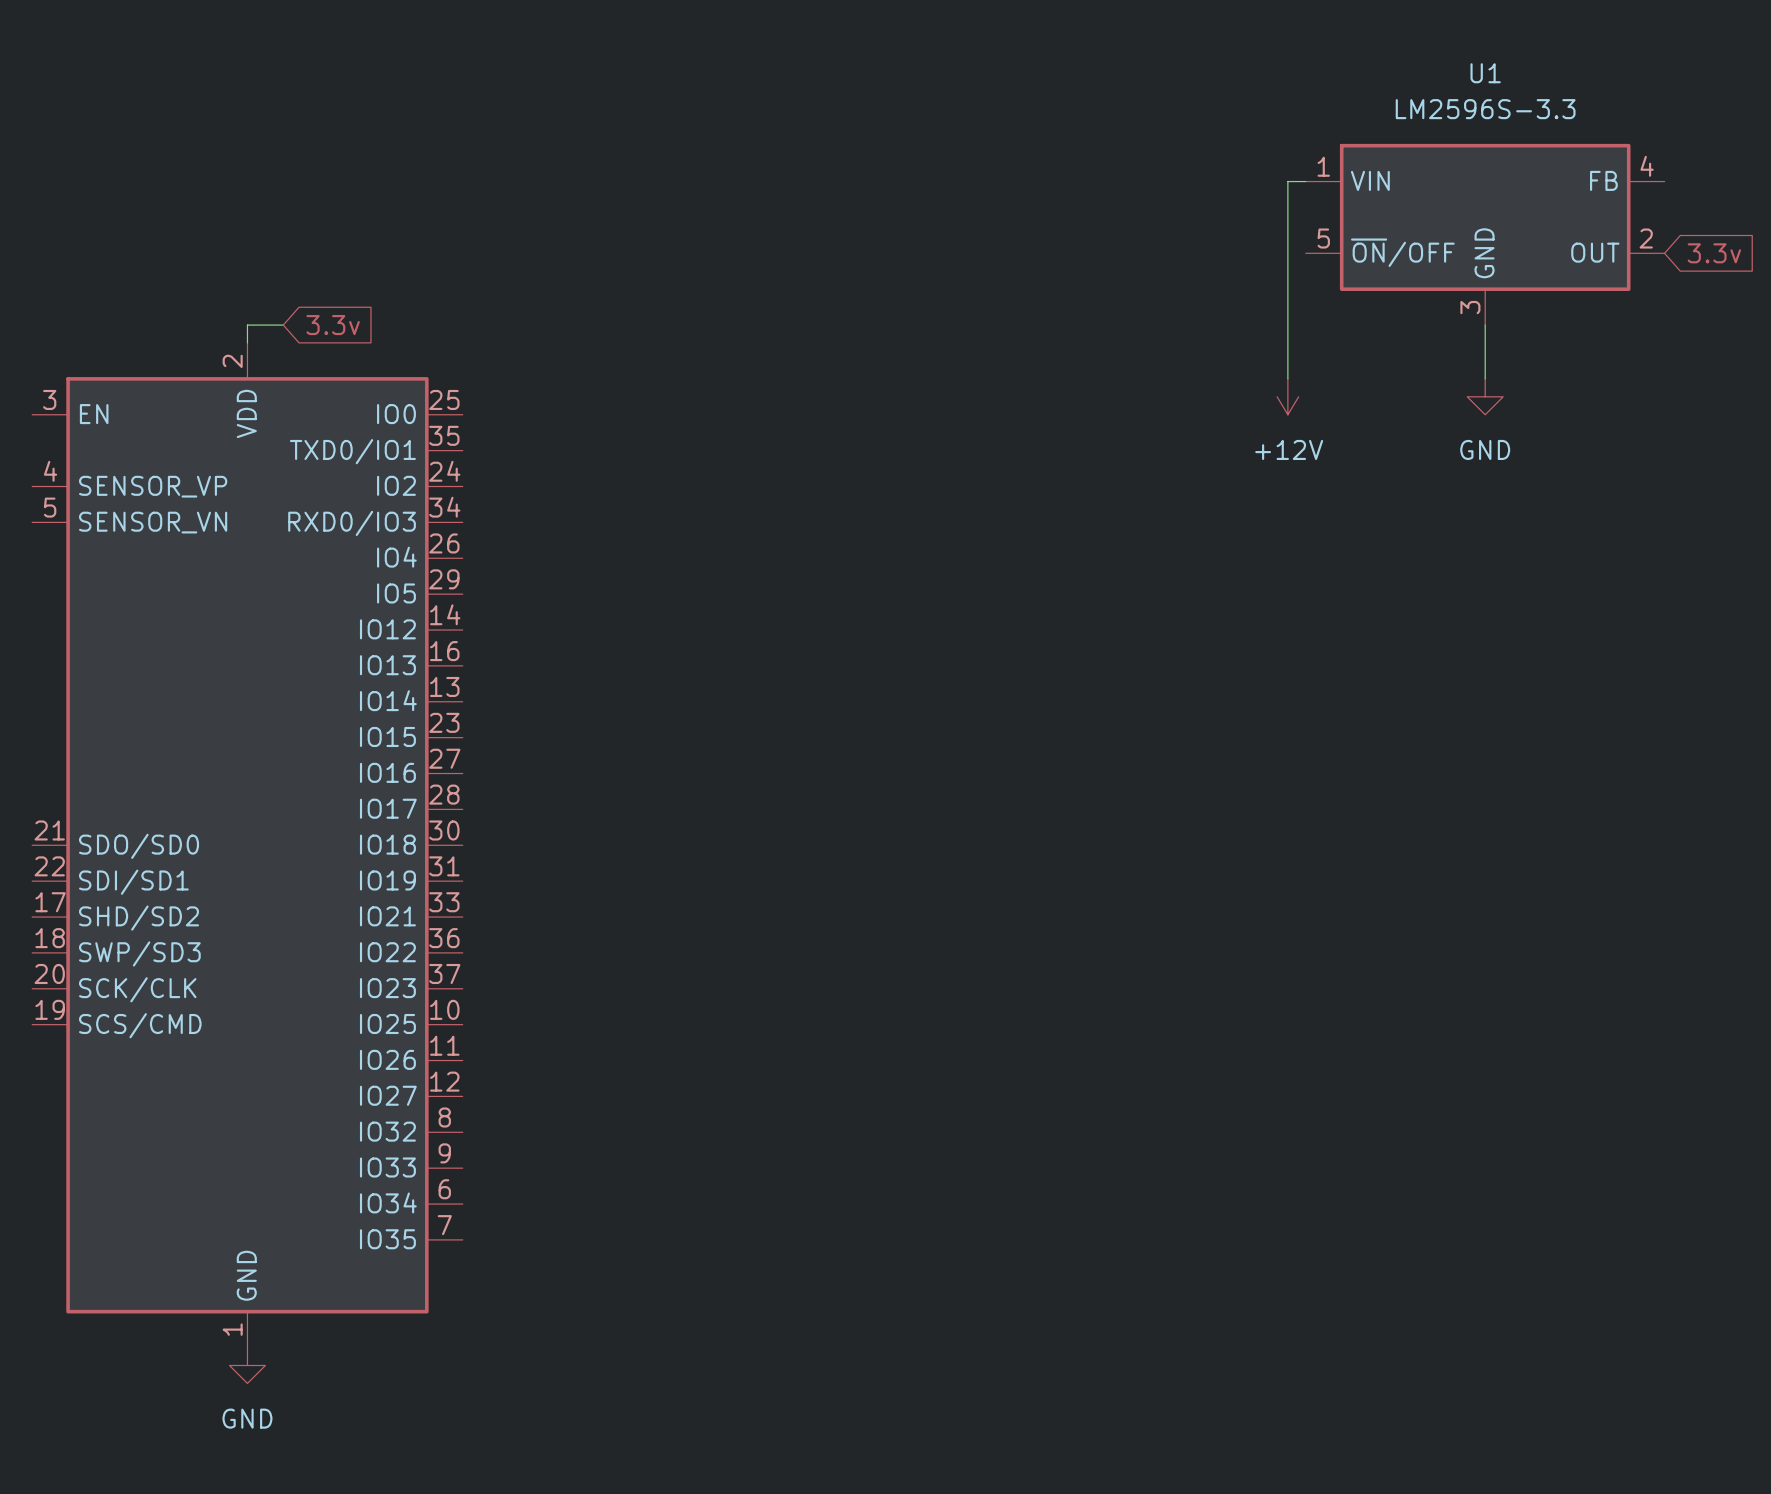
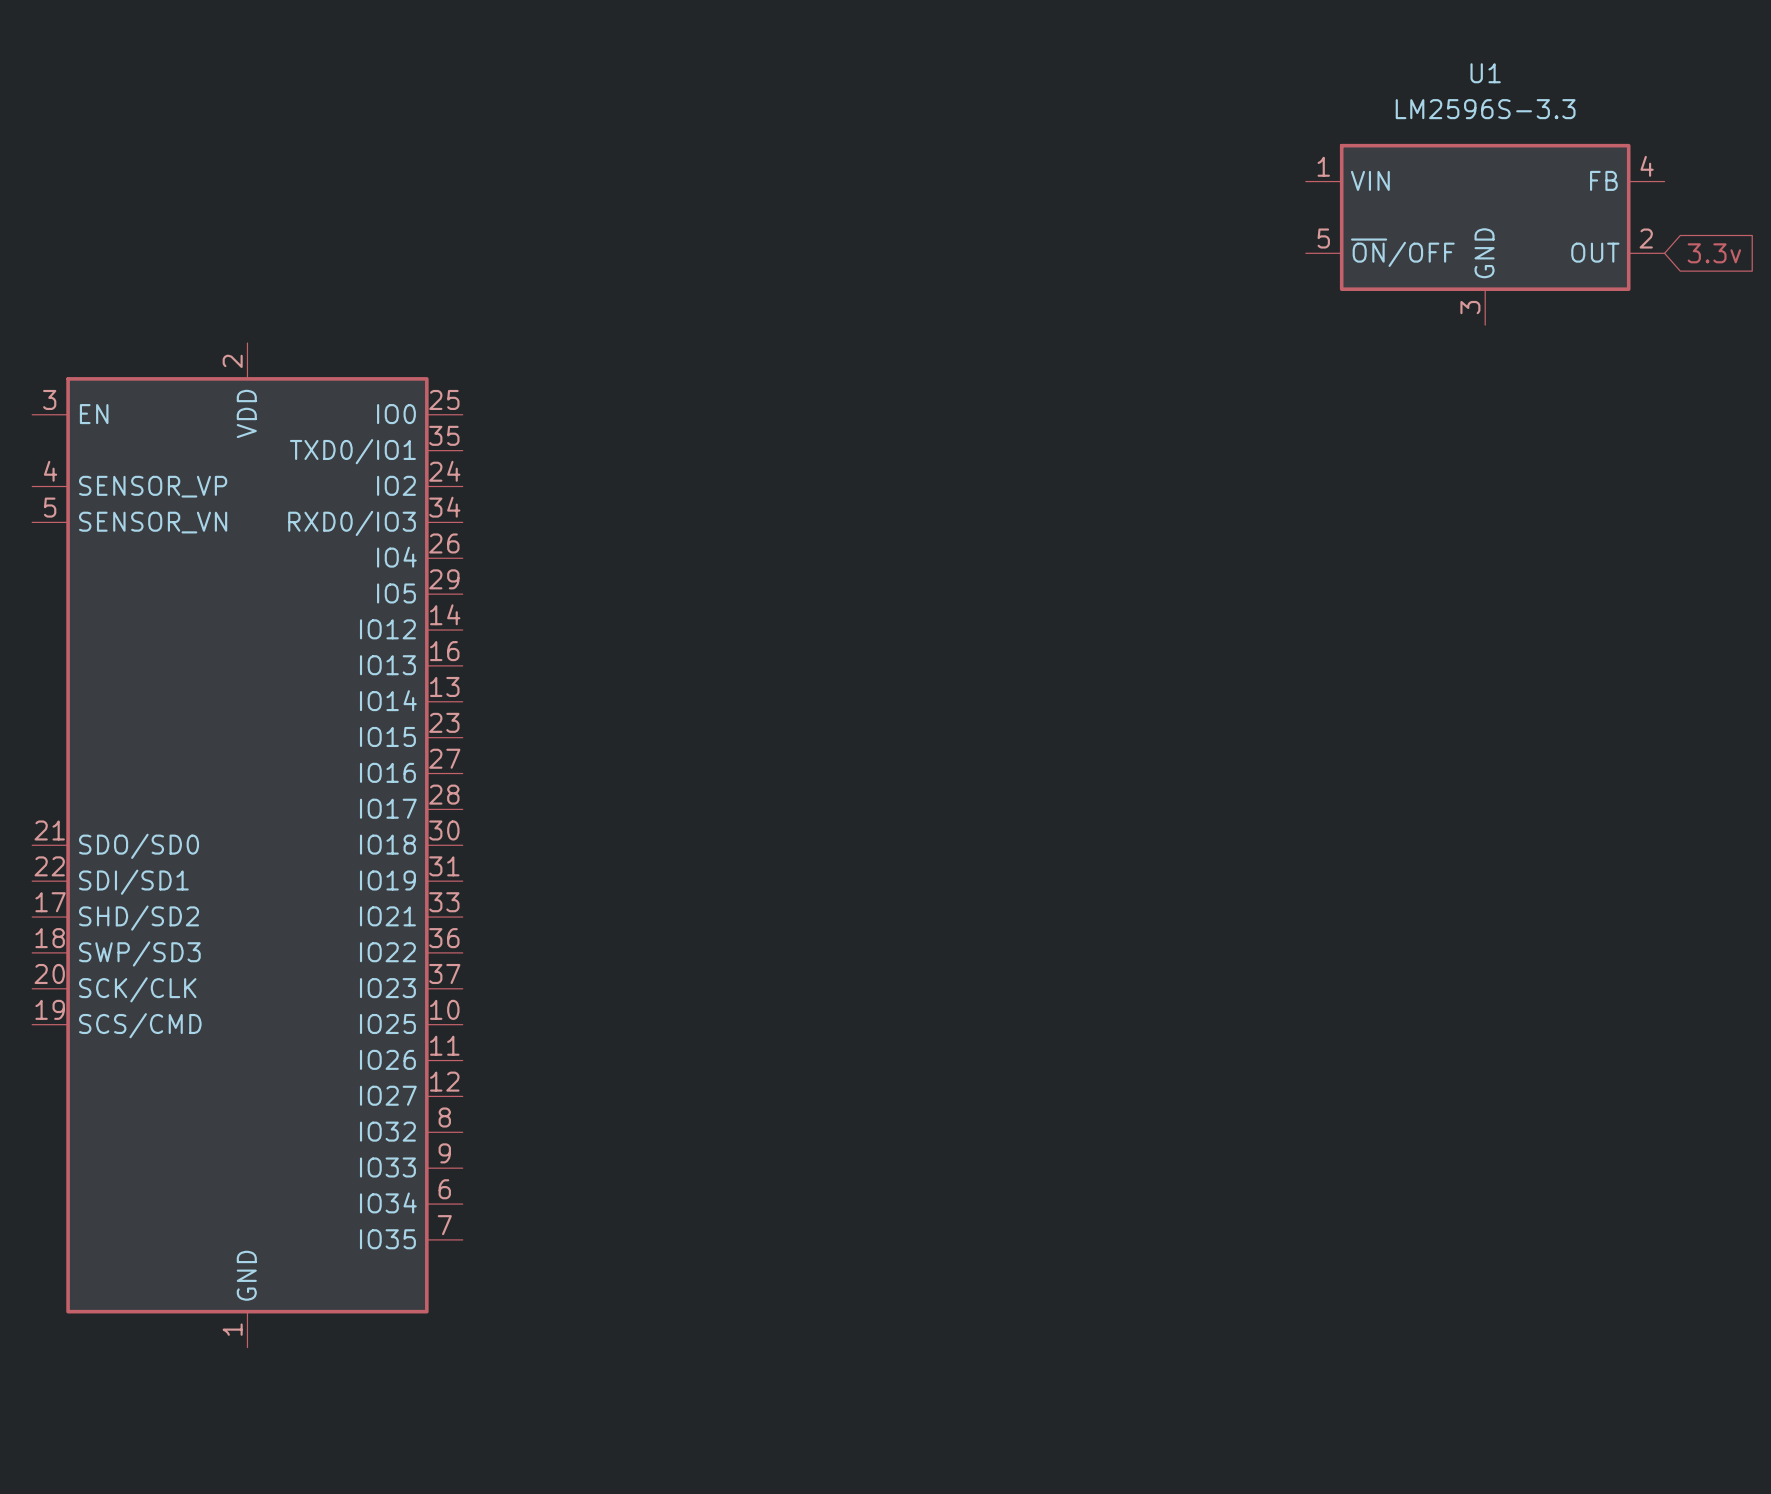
wire: (1305, 181) (1287, 181) (1287, 378) -> none
wire: (283, 325) (247, 325) (247, 343) -> none
global label: 3.3v (333, 325) -> none
wire: (1485, 325) (1485, 378) -> none
power symbol: +12V (1287, 396) -> none
power symbol: GND (1485, 396) -> none
power symbol: GND (247, 1365) -> none

